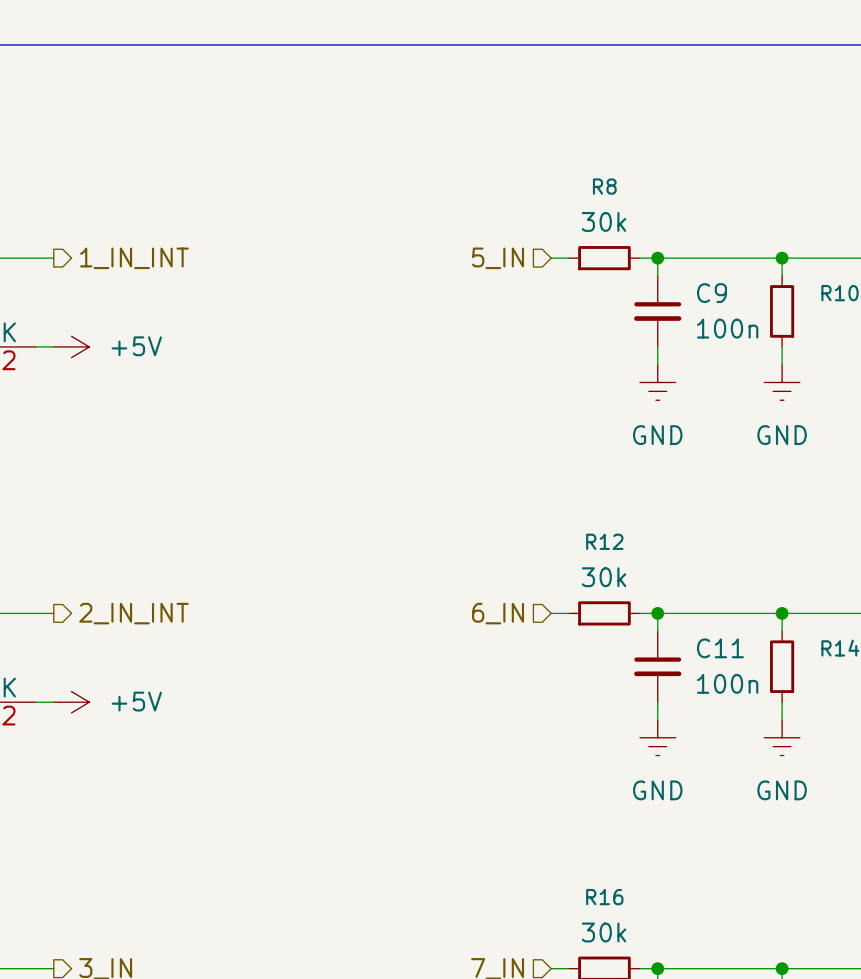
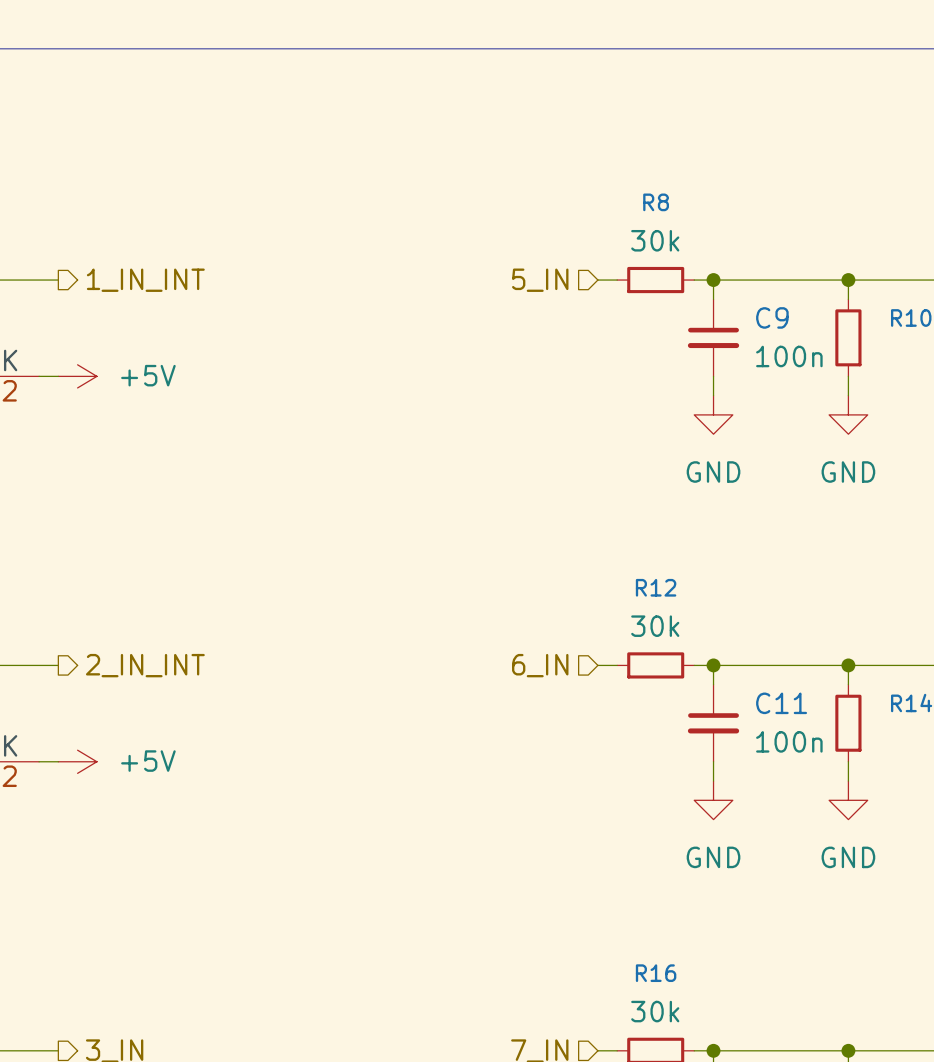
power symbol shape: [639, 364, 676, 401] -> [694, 395, 733, 435]
power symbol shape: [764, 364, 800, 401] -> [829, 395, 868, 435]
power symbol shape: [639, 719, 676, 756] -> [694, 781, 733, 820]
power symbol shape: [764, 719, 800, 756] -> [829, 781, 868, 820]

